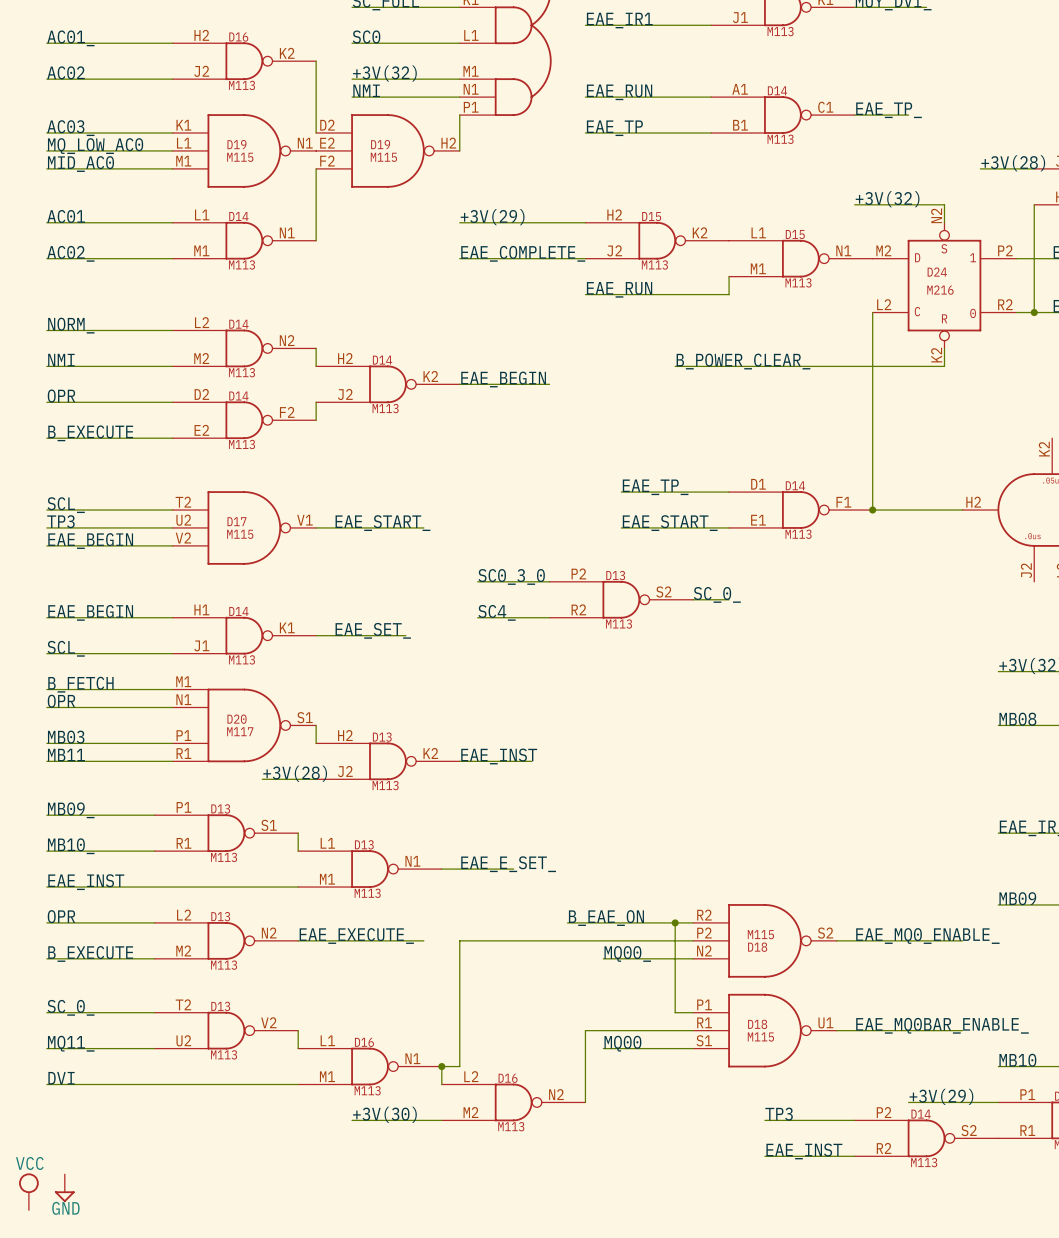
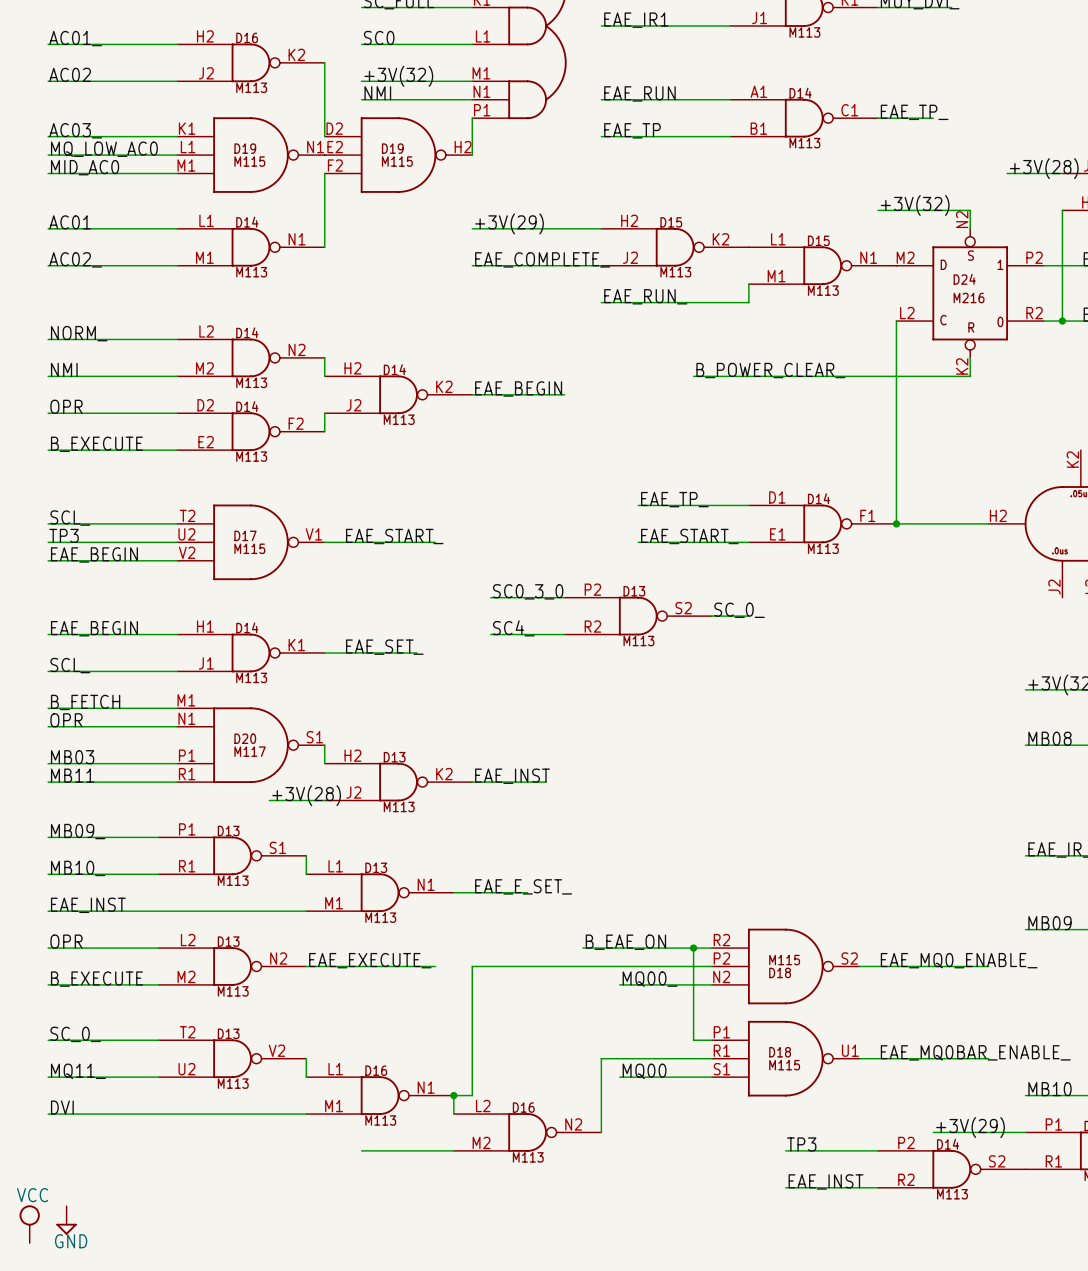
label: EAE_RUN (619, 289) -> EAE_RUN_ (645, 296)
label: +3V(30) (384, 1114) -> none

